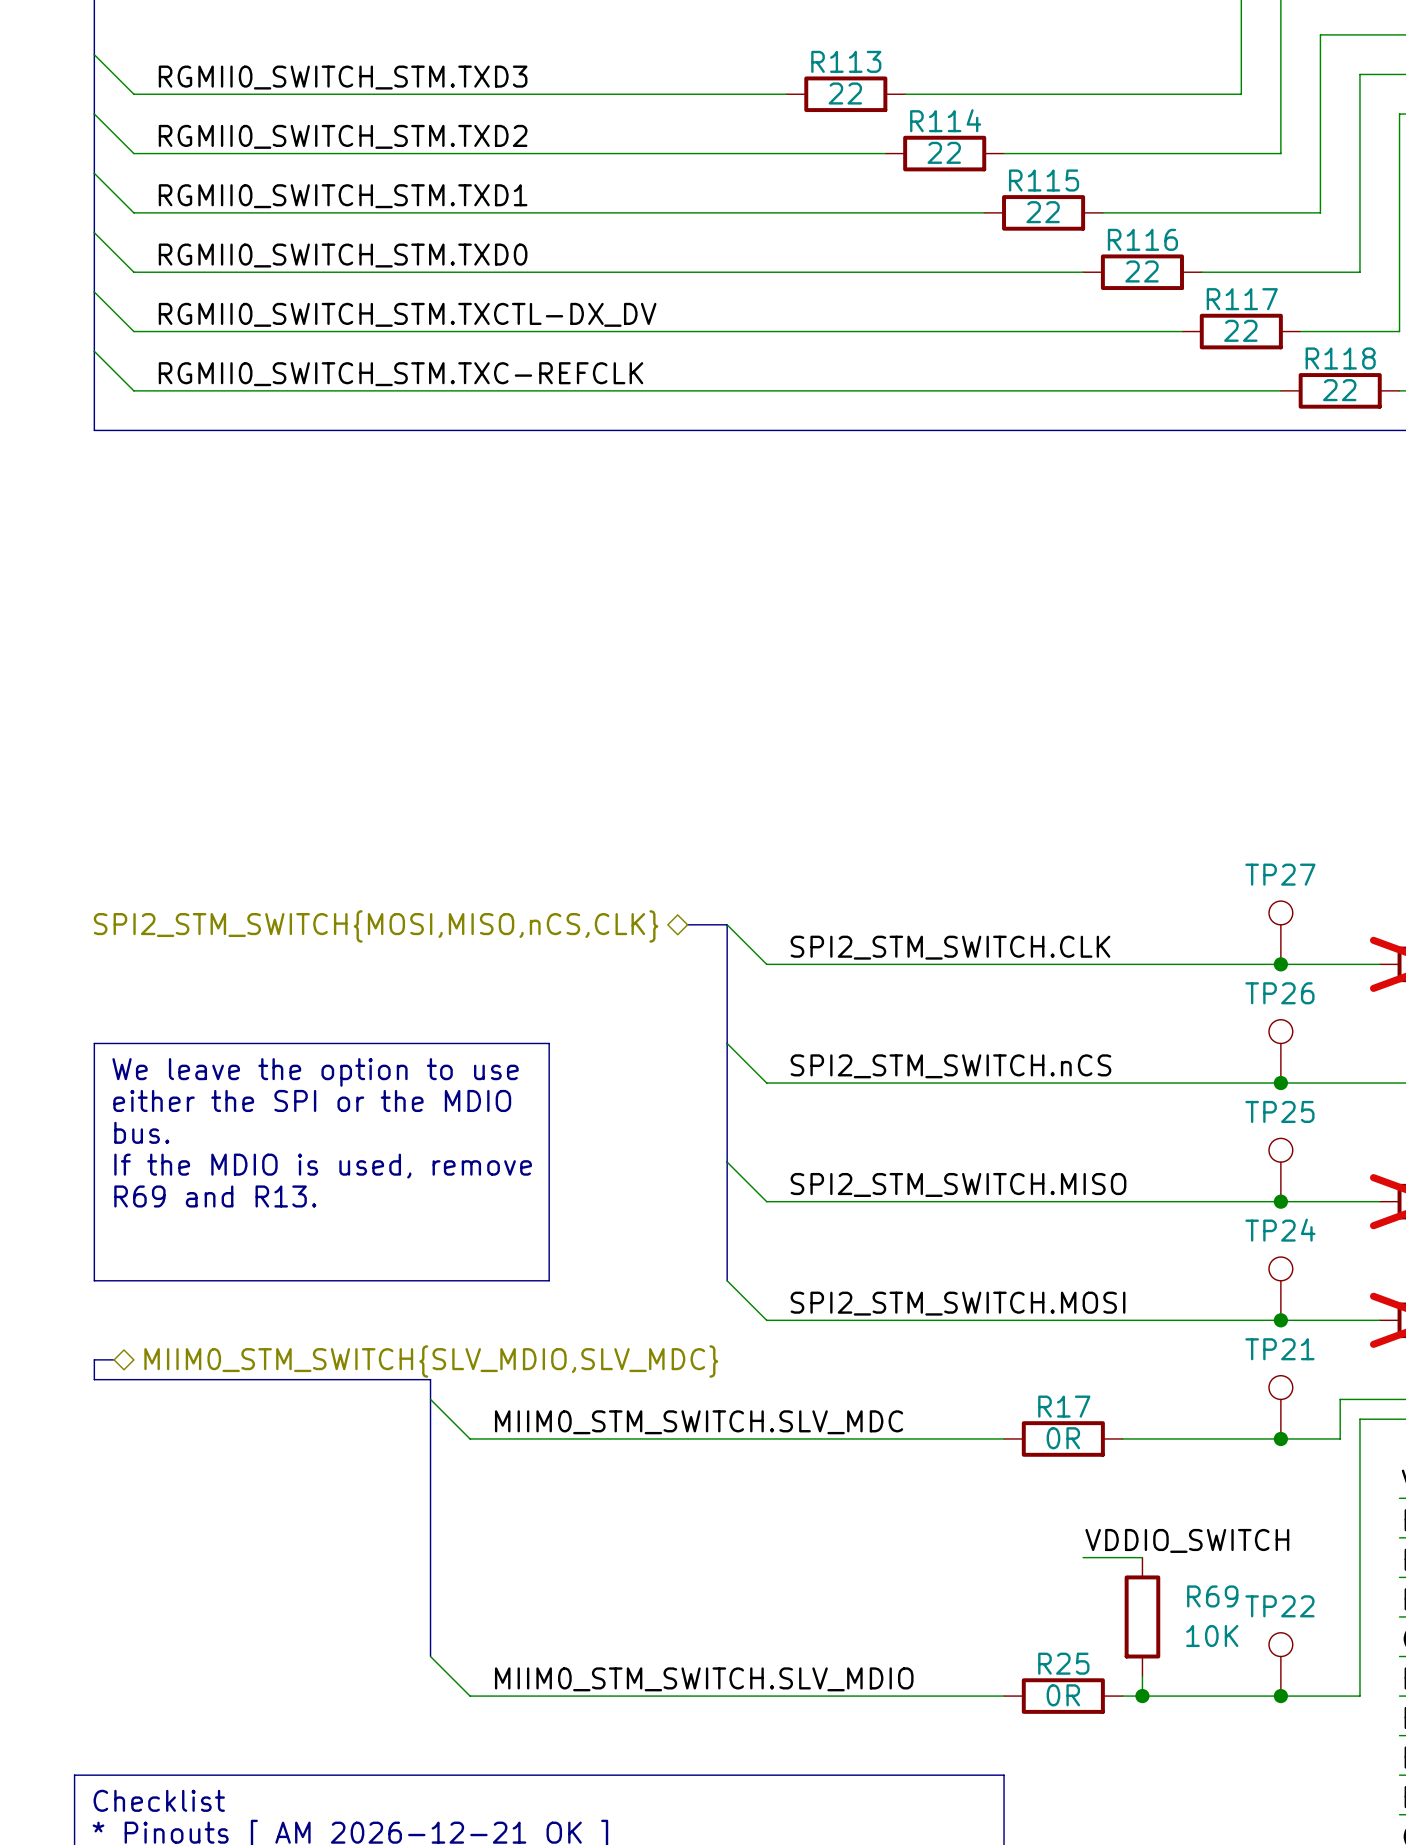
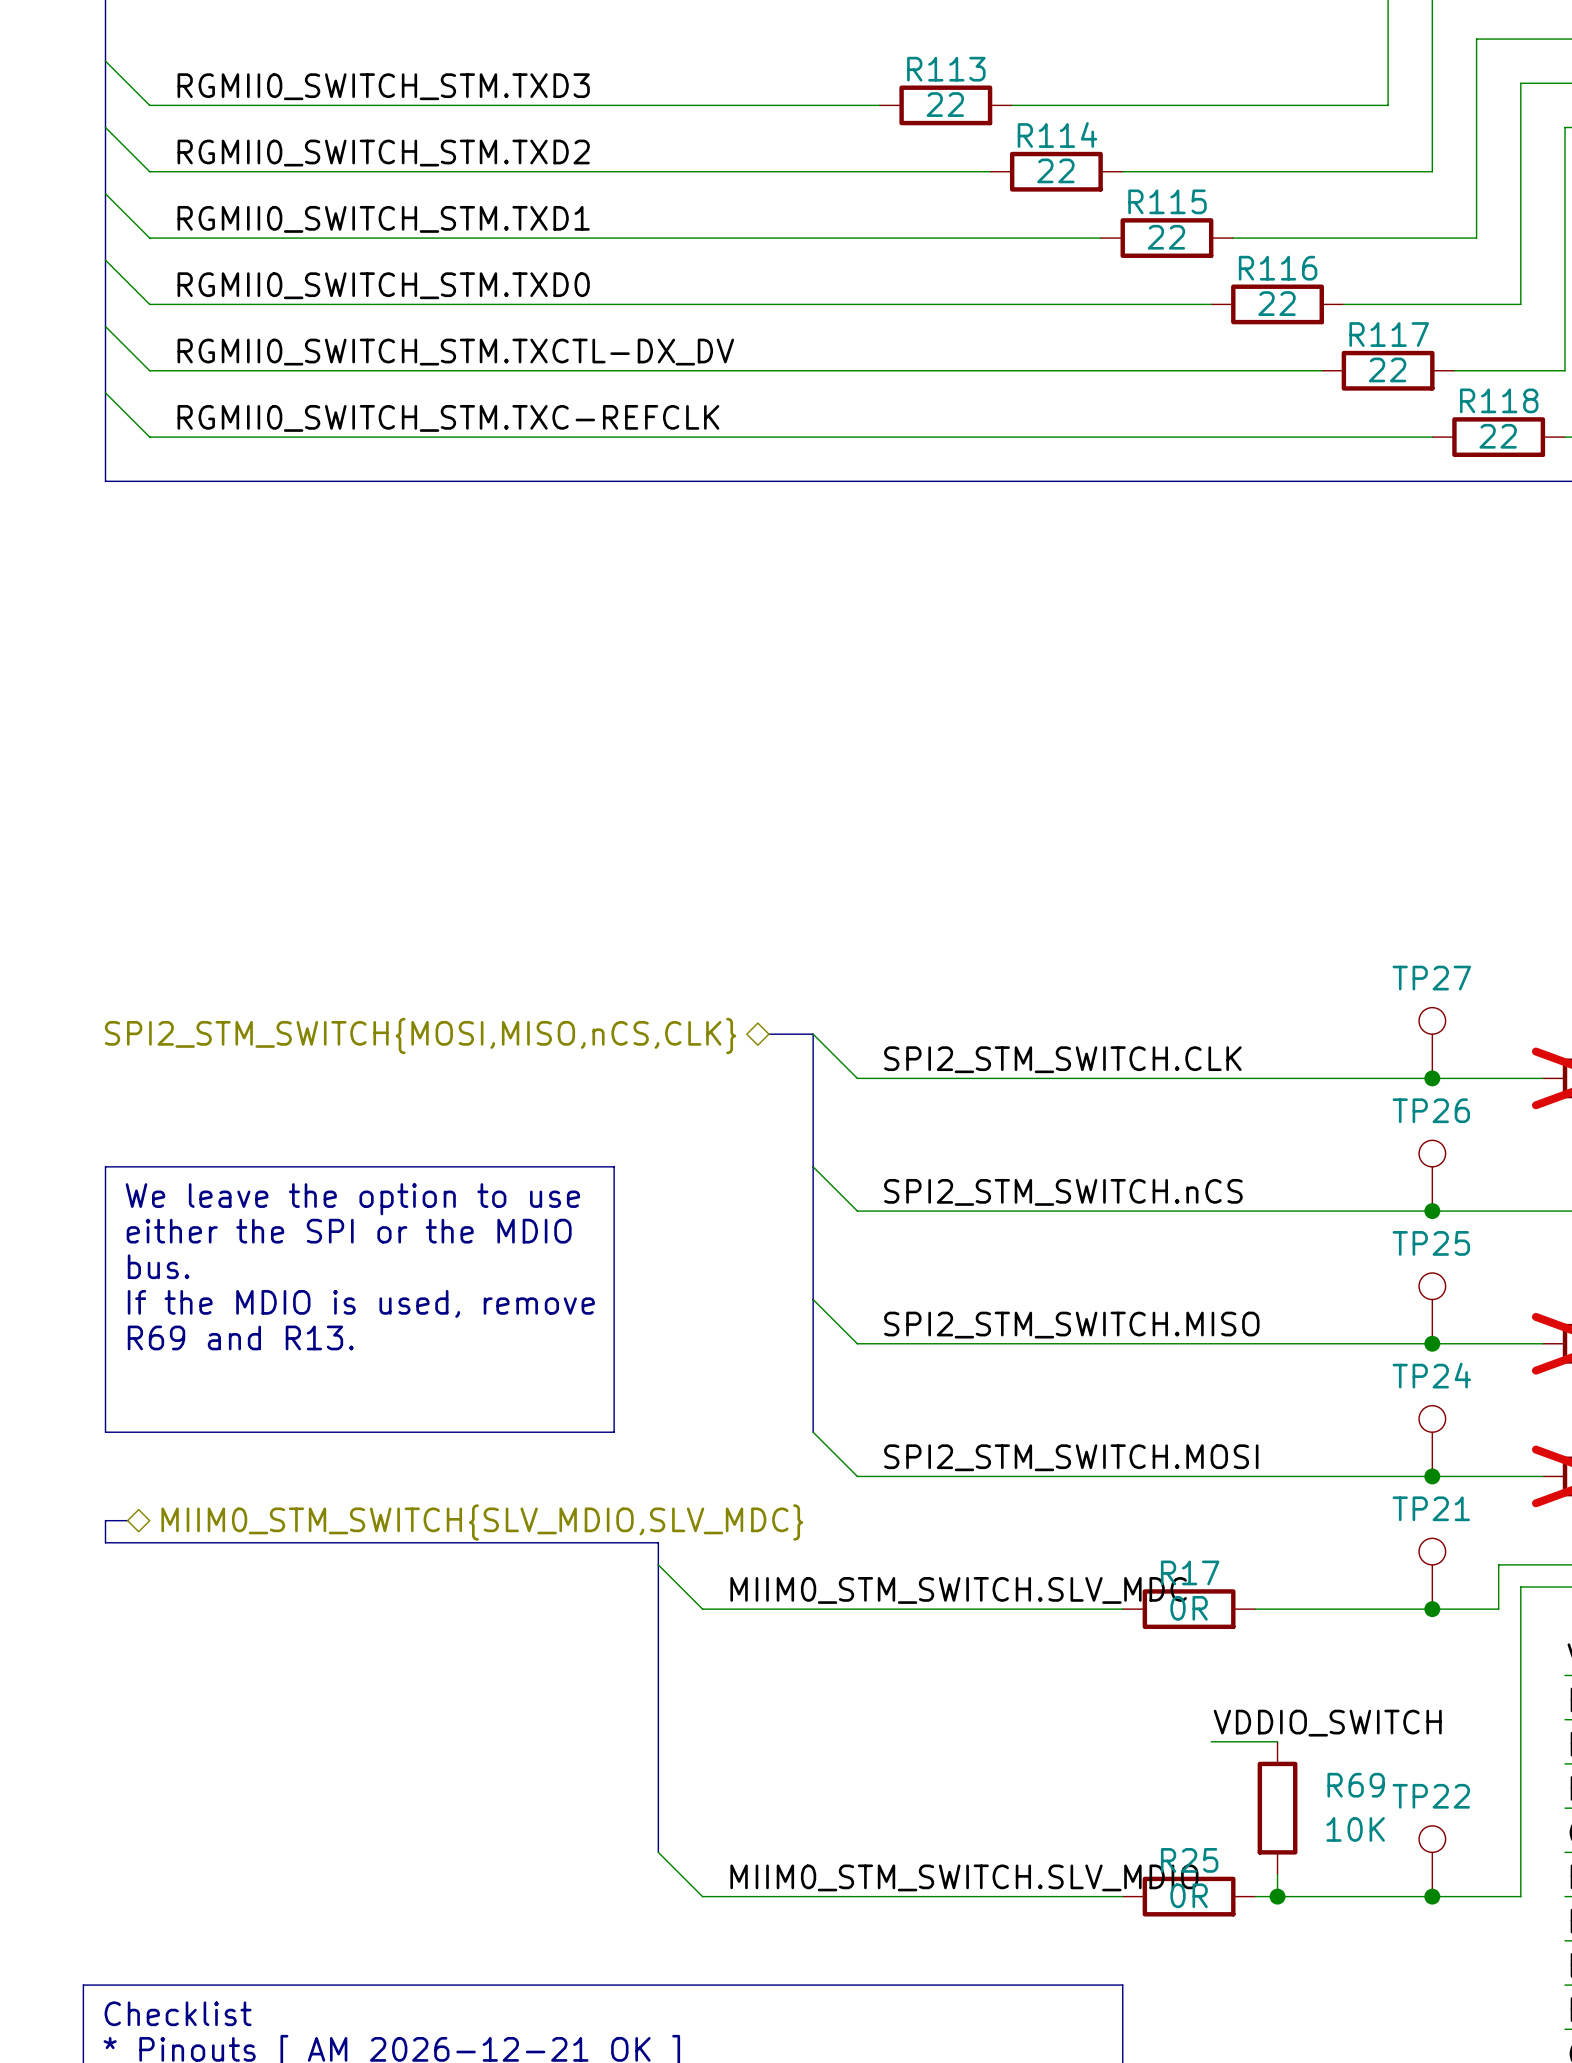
bus: (430, 1379) (430, 1656) -> (481, 1542) (658, 1542) (658, 1852)
wire: (430, 1399) (470, 1438) (628, 1438) -> (658, 1564) (702, 1609)
label position: MIIM0_STM_SWITCH.SLV_MDC (699, 1422) -> MIIM0_STM_SWITCH.SLV_MDC (958, 1590)
wire: (430, 1656) (470, 1696) (628, 1696) -> (658, 1852) (702, 1896)
label position: MIIM0_STM_SWITCH.SLV_MDIO (704, 1679) -> MIIM0_STM_SWITCH.SLV_MDIO (964, 1877)

